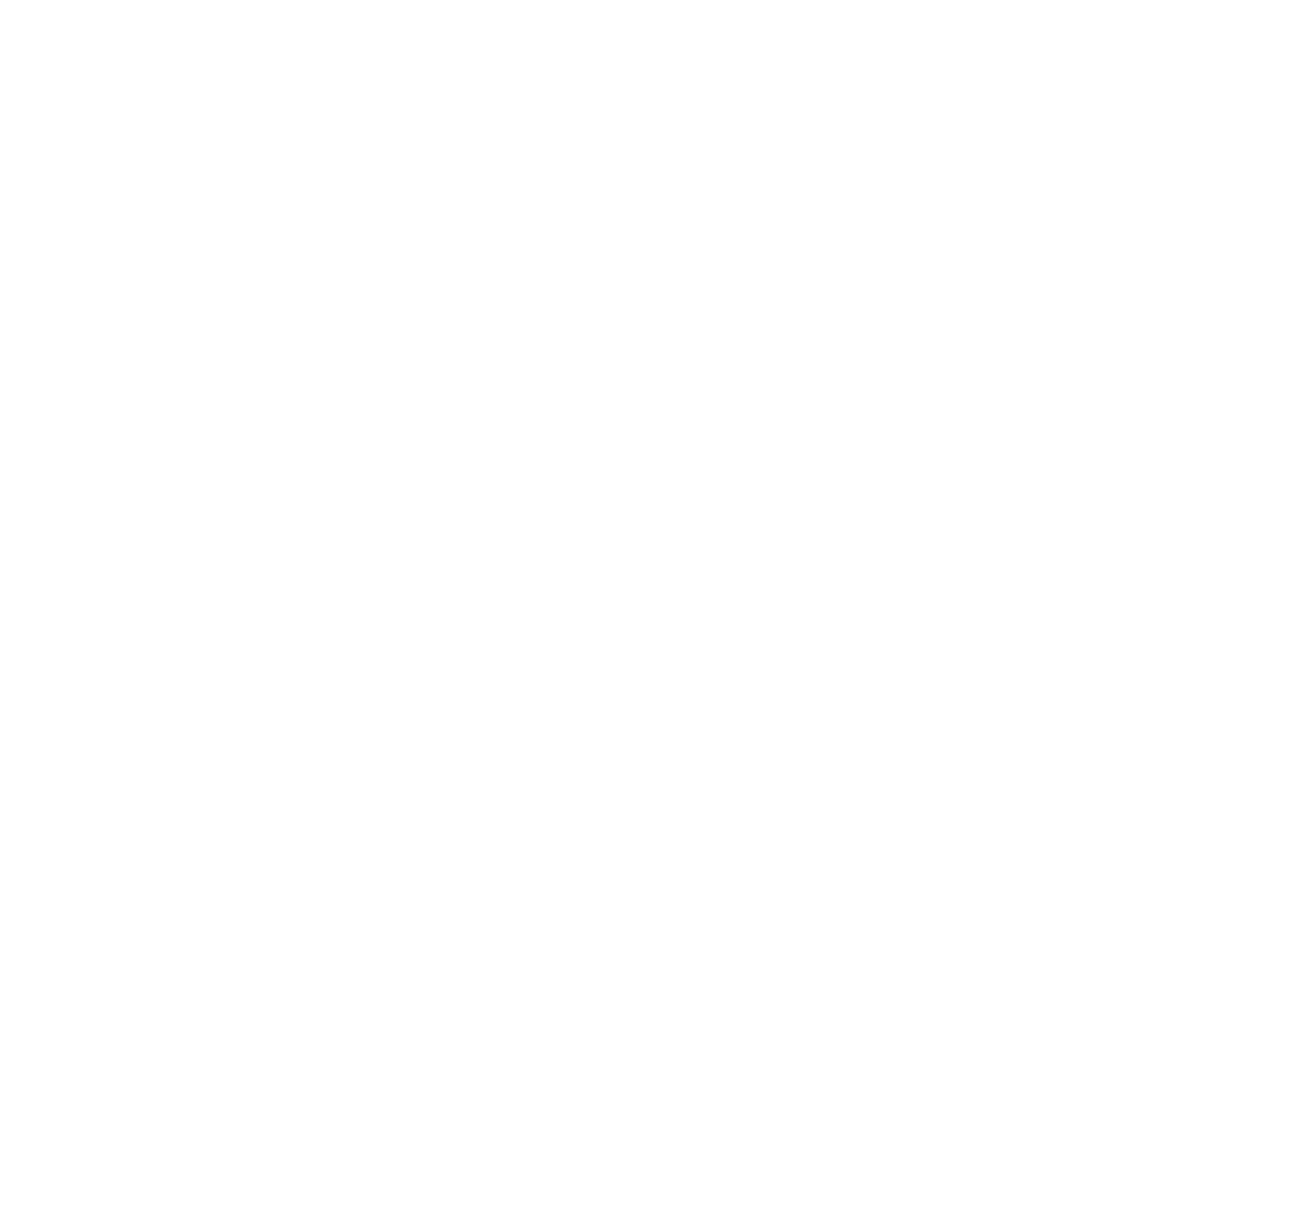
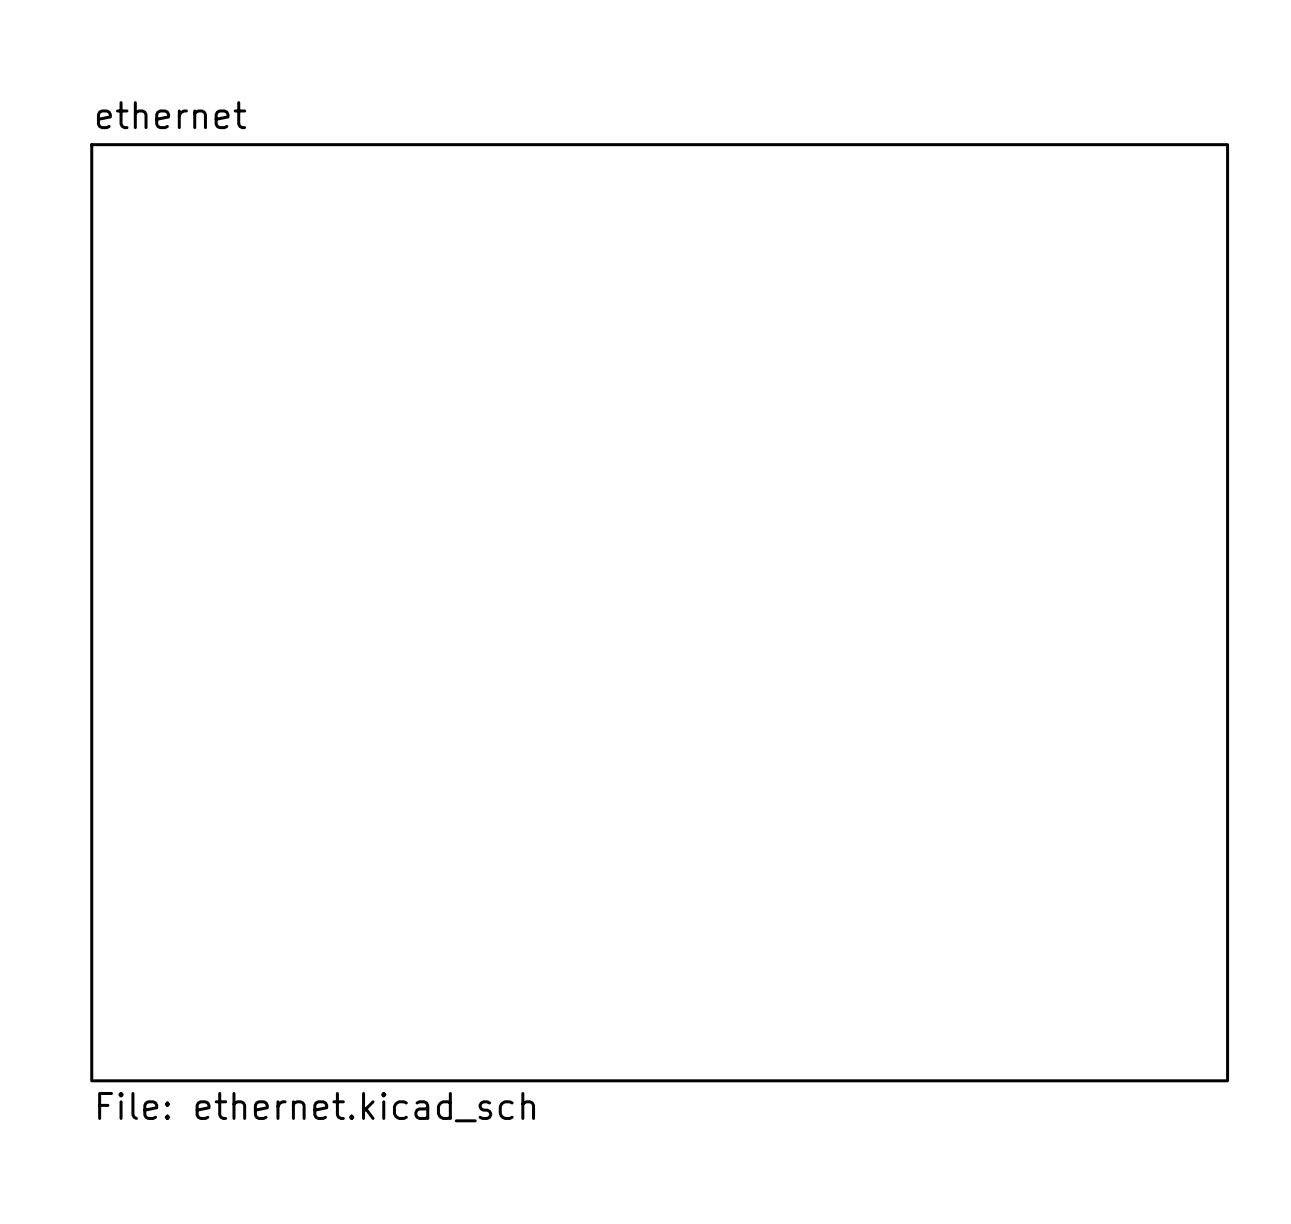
sheet ethernet: none -> File: ethernet.kicad_sch (659, 612)

